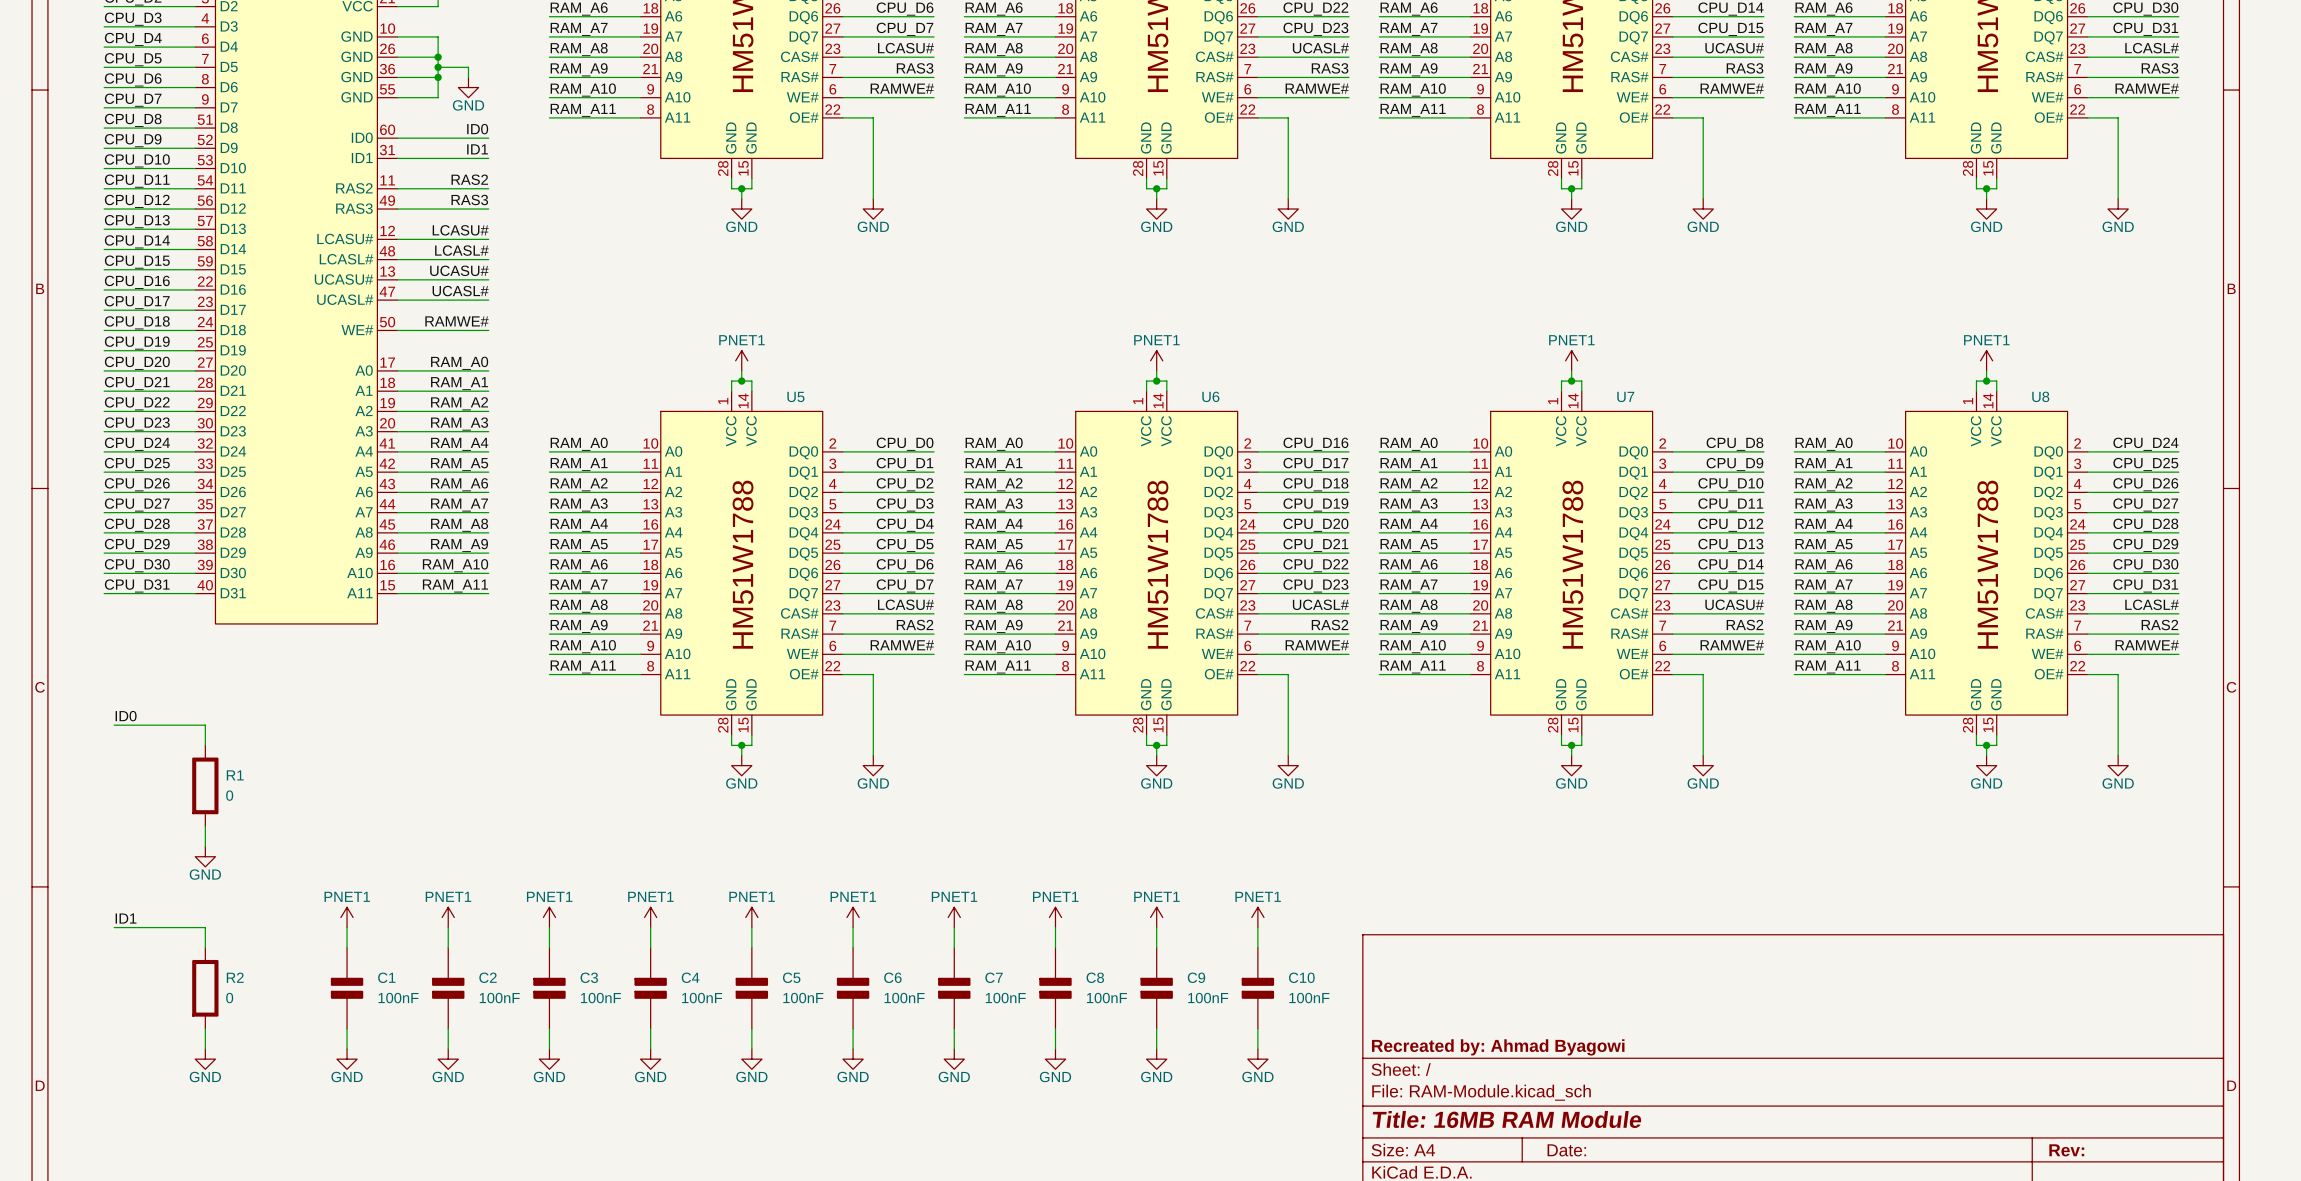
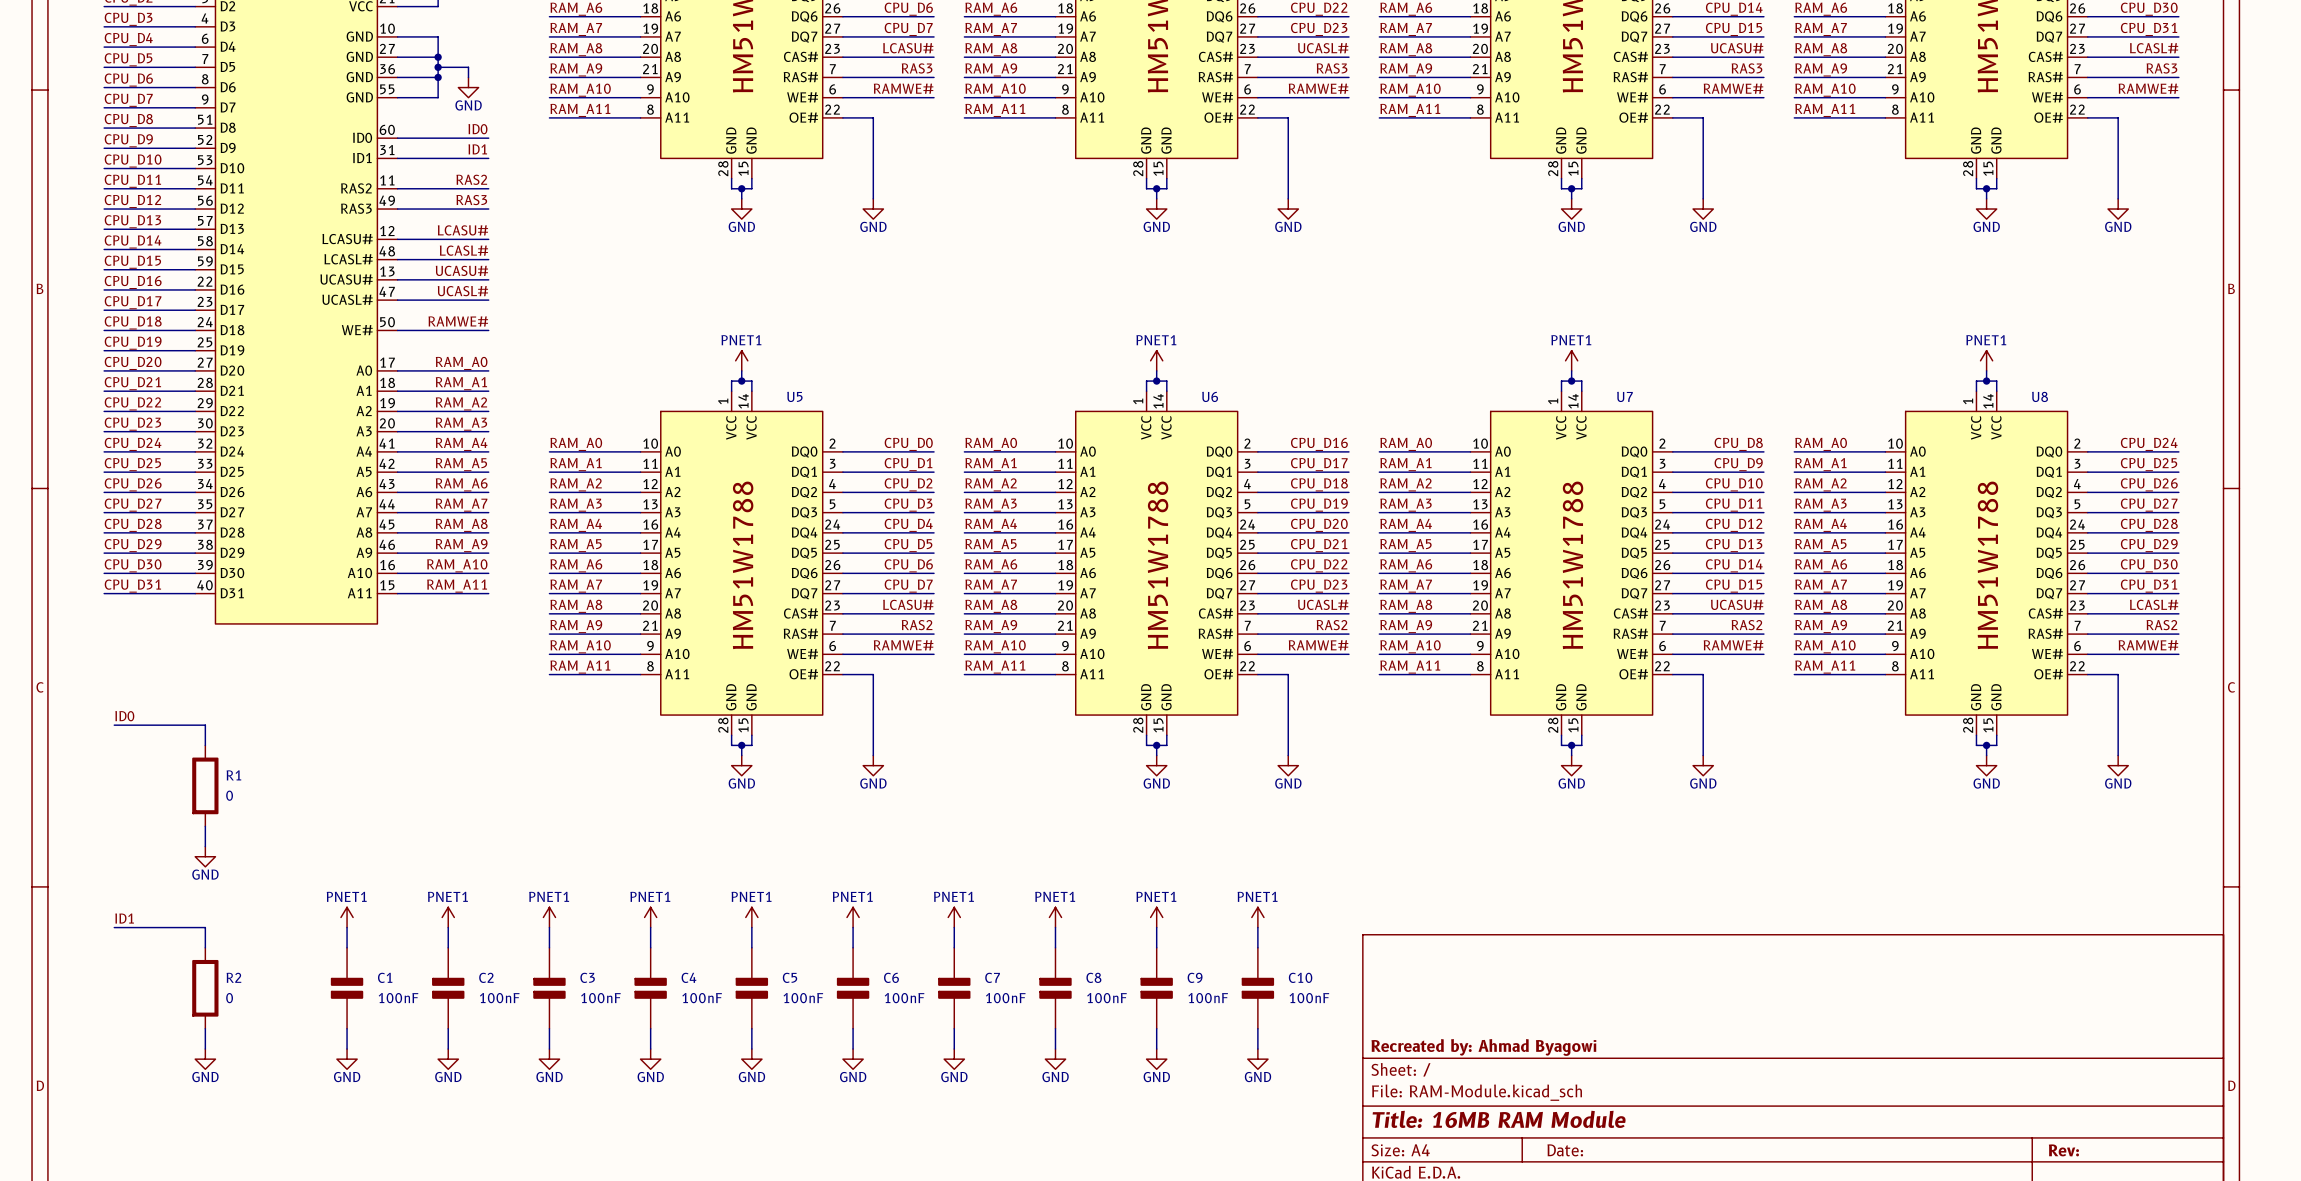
part pin number: 26 (387, 48) -> 27 (387, 48)

